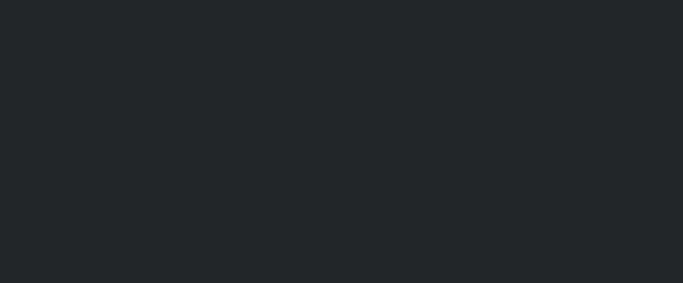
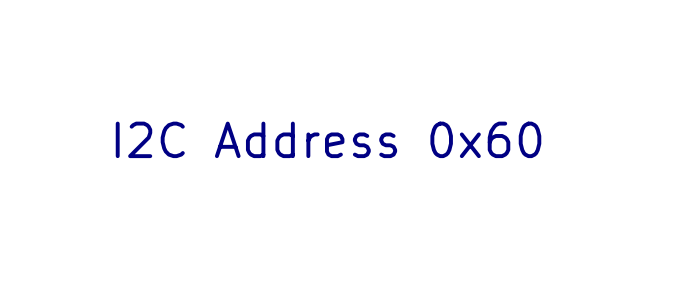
text: none -> I2C Address 0x60 (328, 139)

